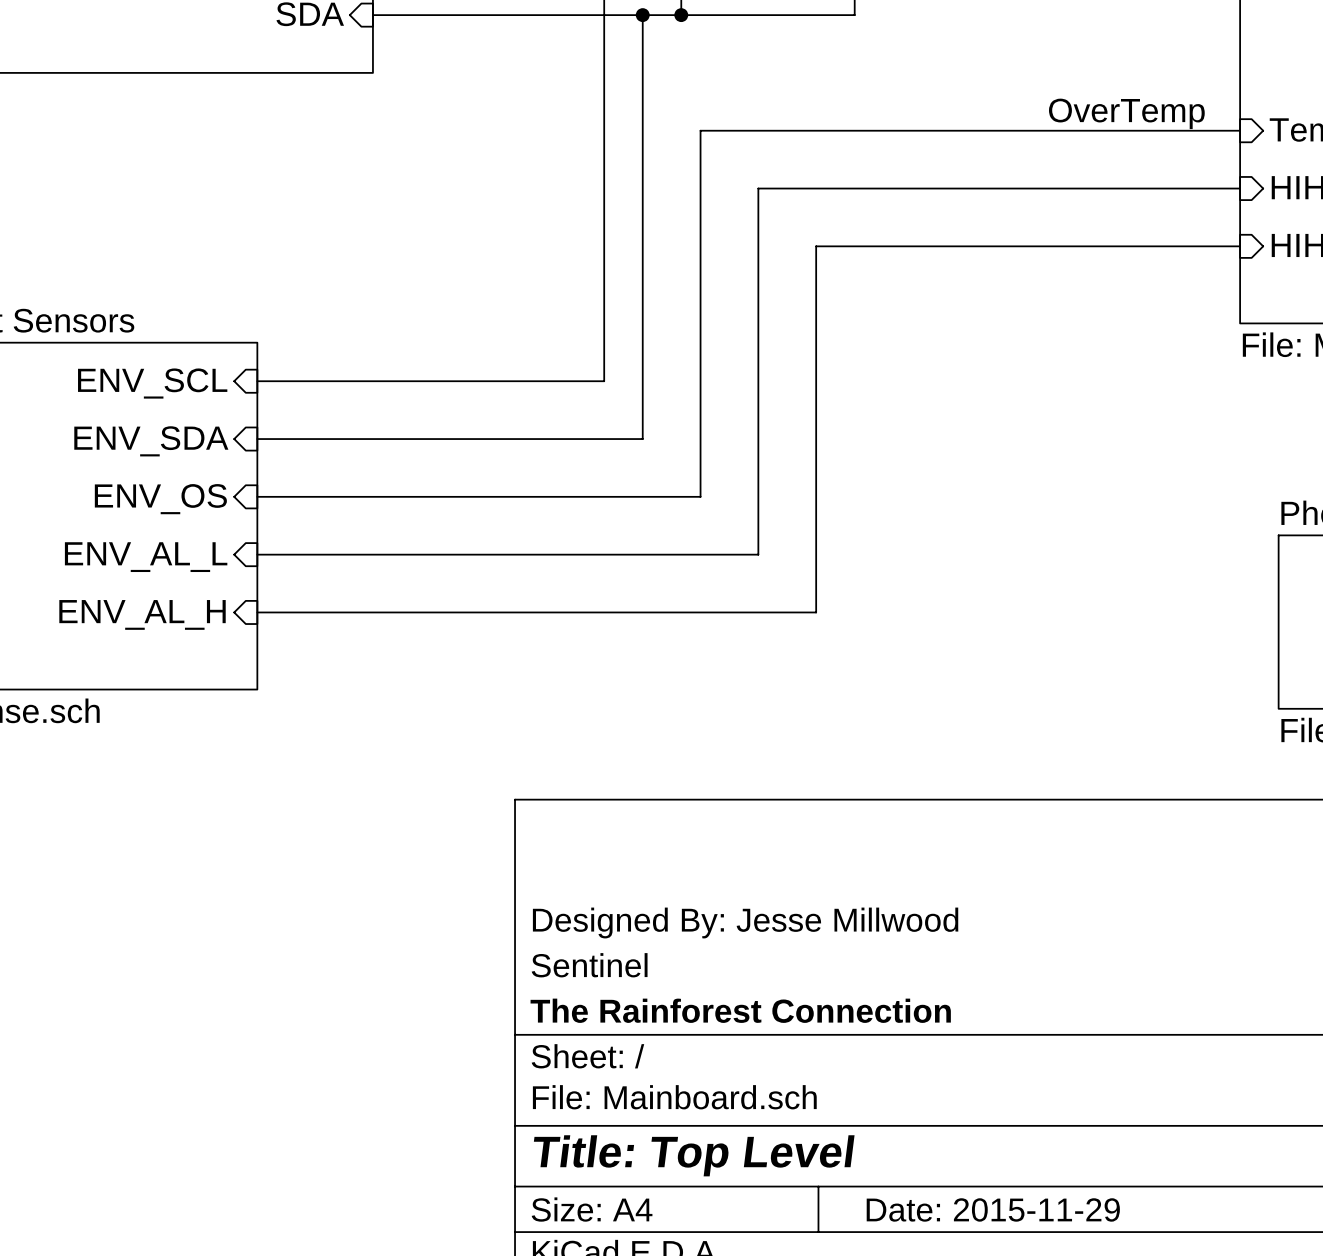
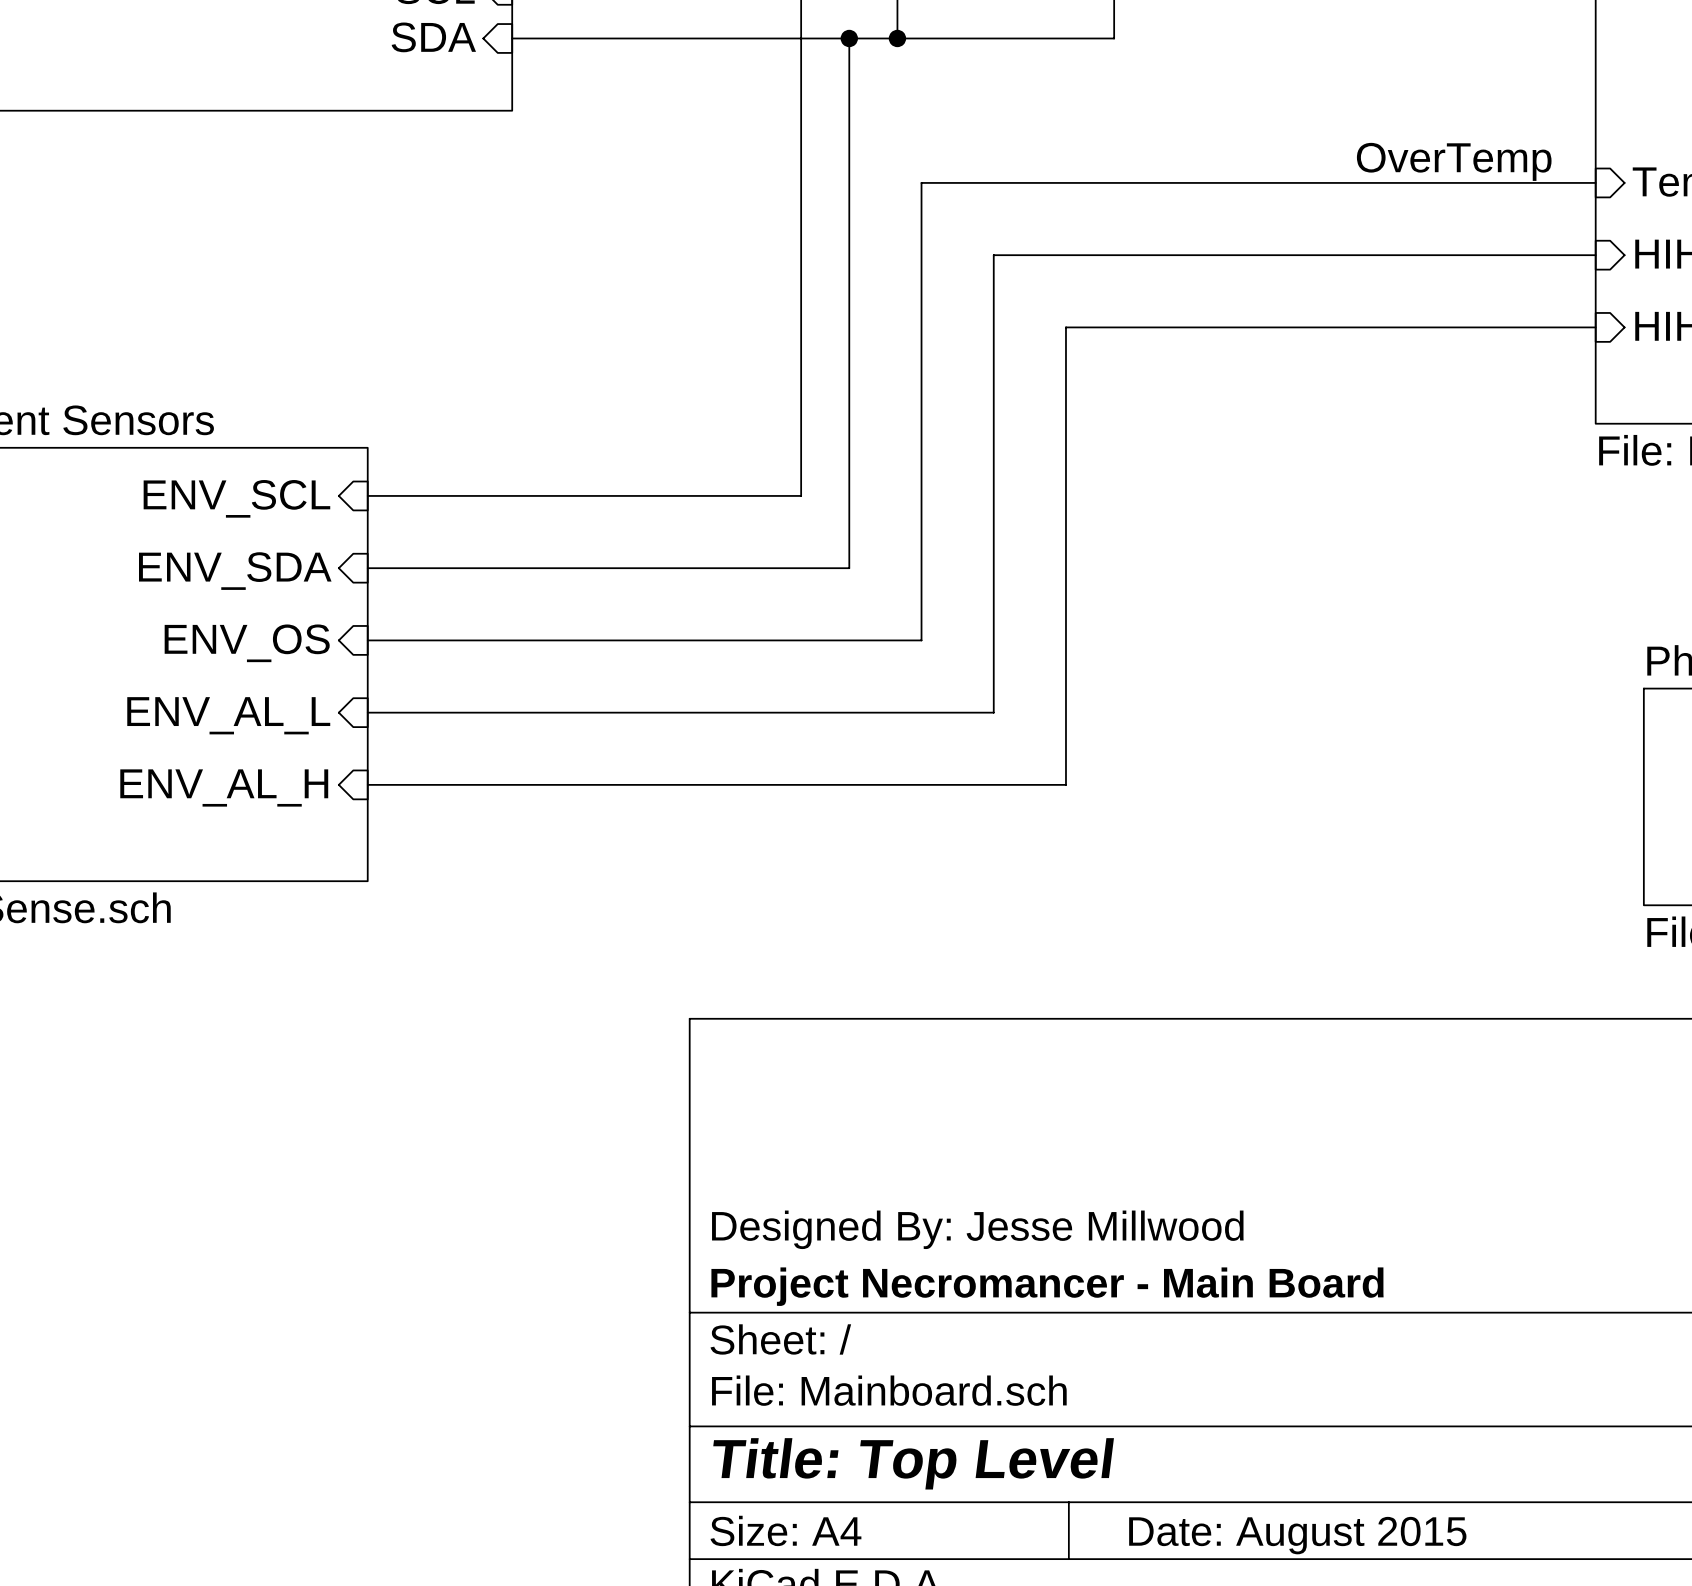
title block: Designed By: Jesse Millwood (745, 923) -> none
title block: Sentinel (589, 965) -> Designed By: Jesse Millwood (977, 1229)
title block: The Rainforest Connection (740, 1010) -> Project Necromancer - Main Board (1047, 1286)
title block: Date: 2015-11-29 (993, 1209) -> Date: August 2015 (1297, 1535)

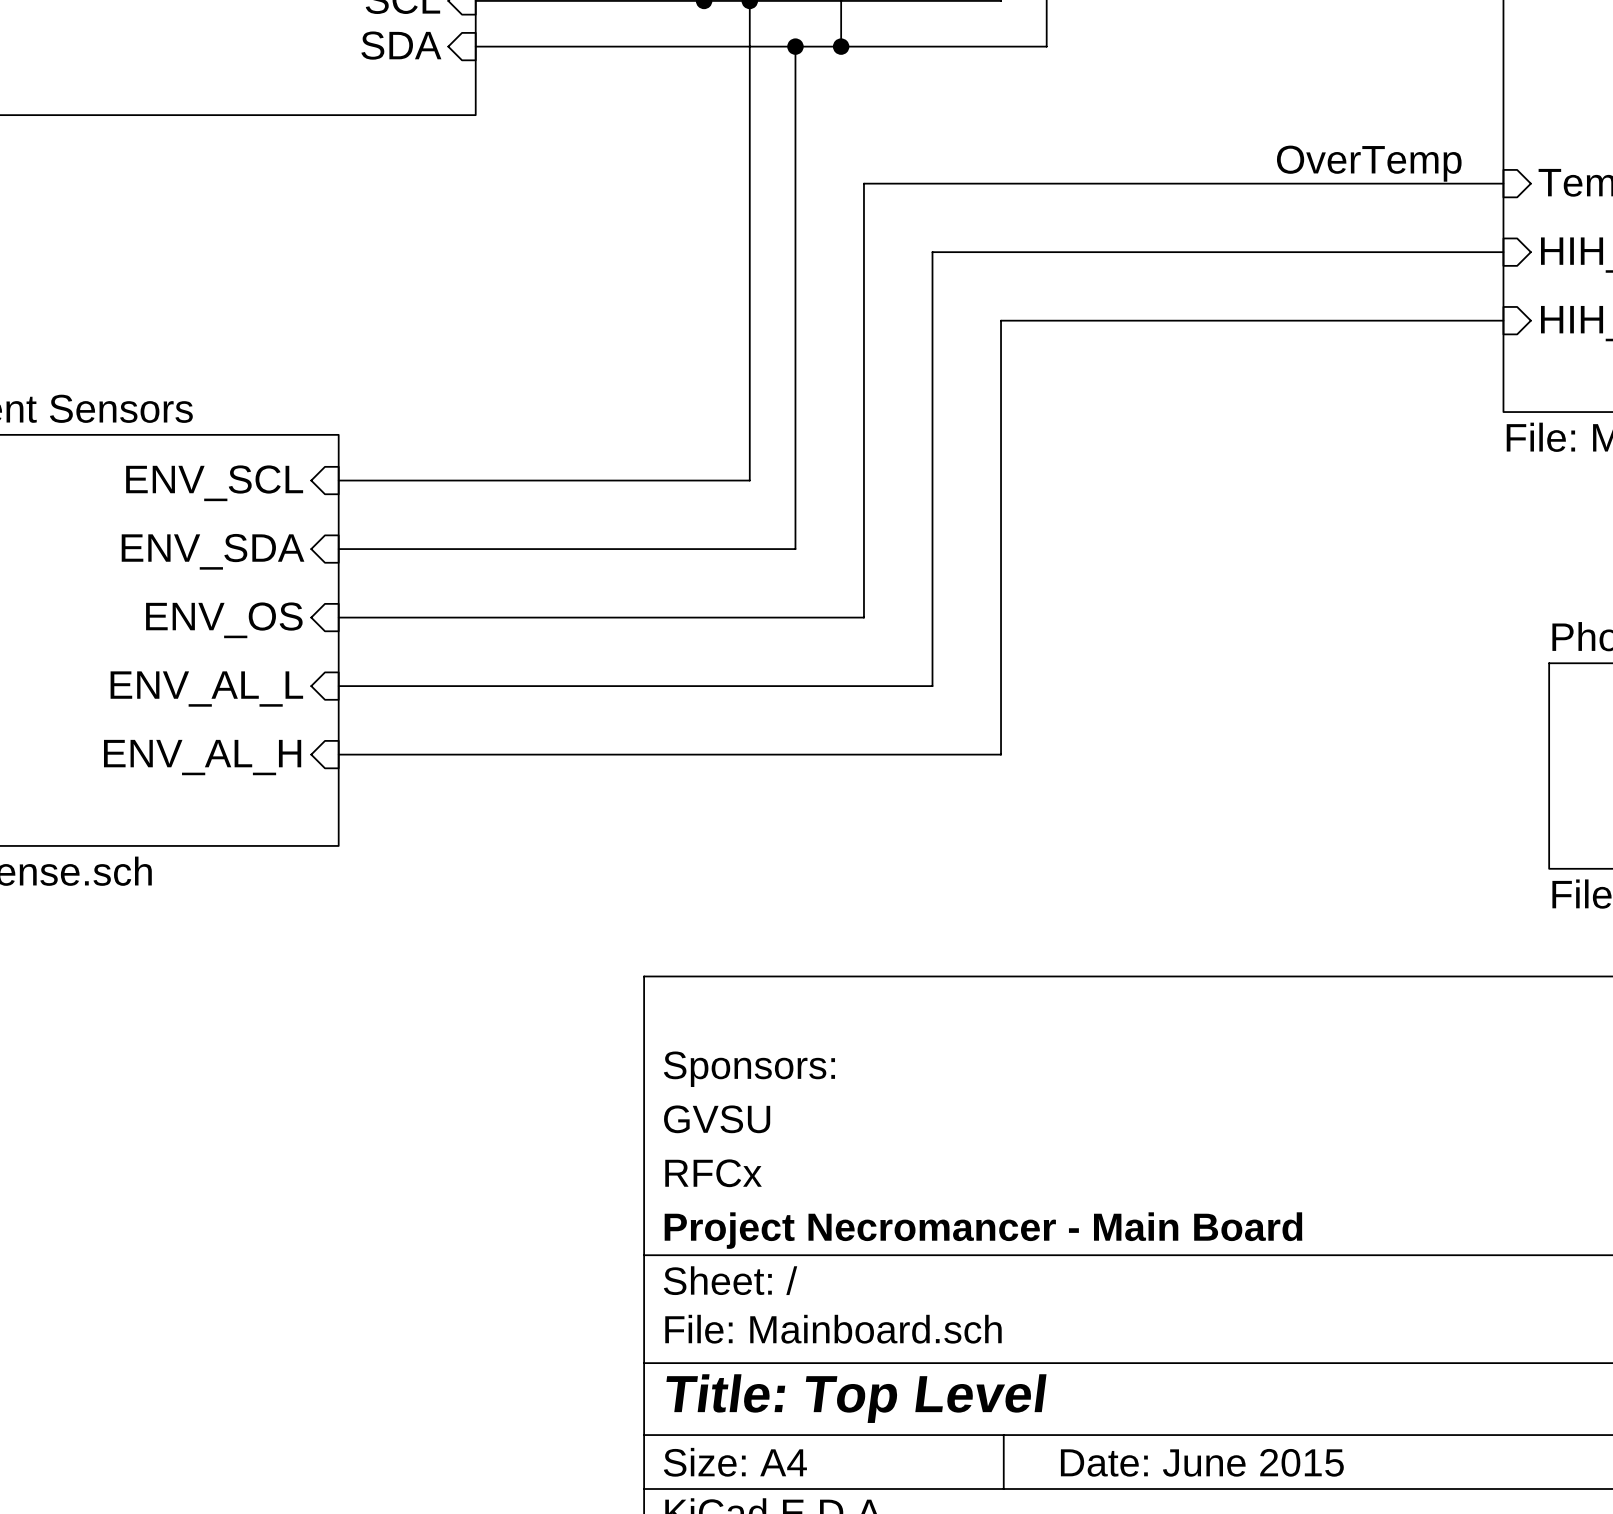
title block: none -> Sponsors: (749, 1069)
title block: none -> GVSU (717, 1119)
title block: Designed By: Jesse Millwood (977, 1229) -> RFCx (713, 1173)
title block: Date: August 2015 (1297, 1535) -> Date: June 2015 (1202, 1462)

